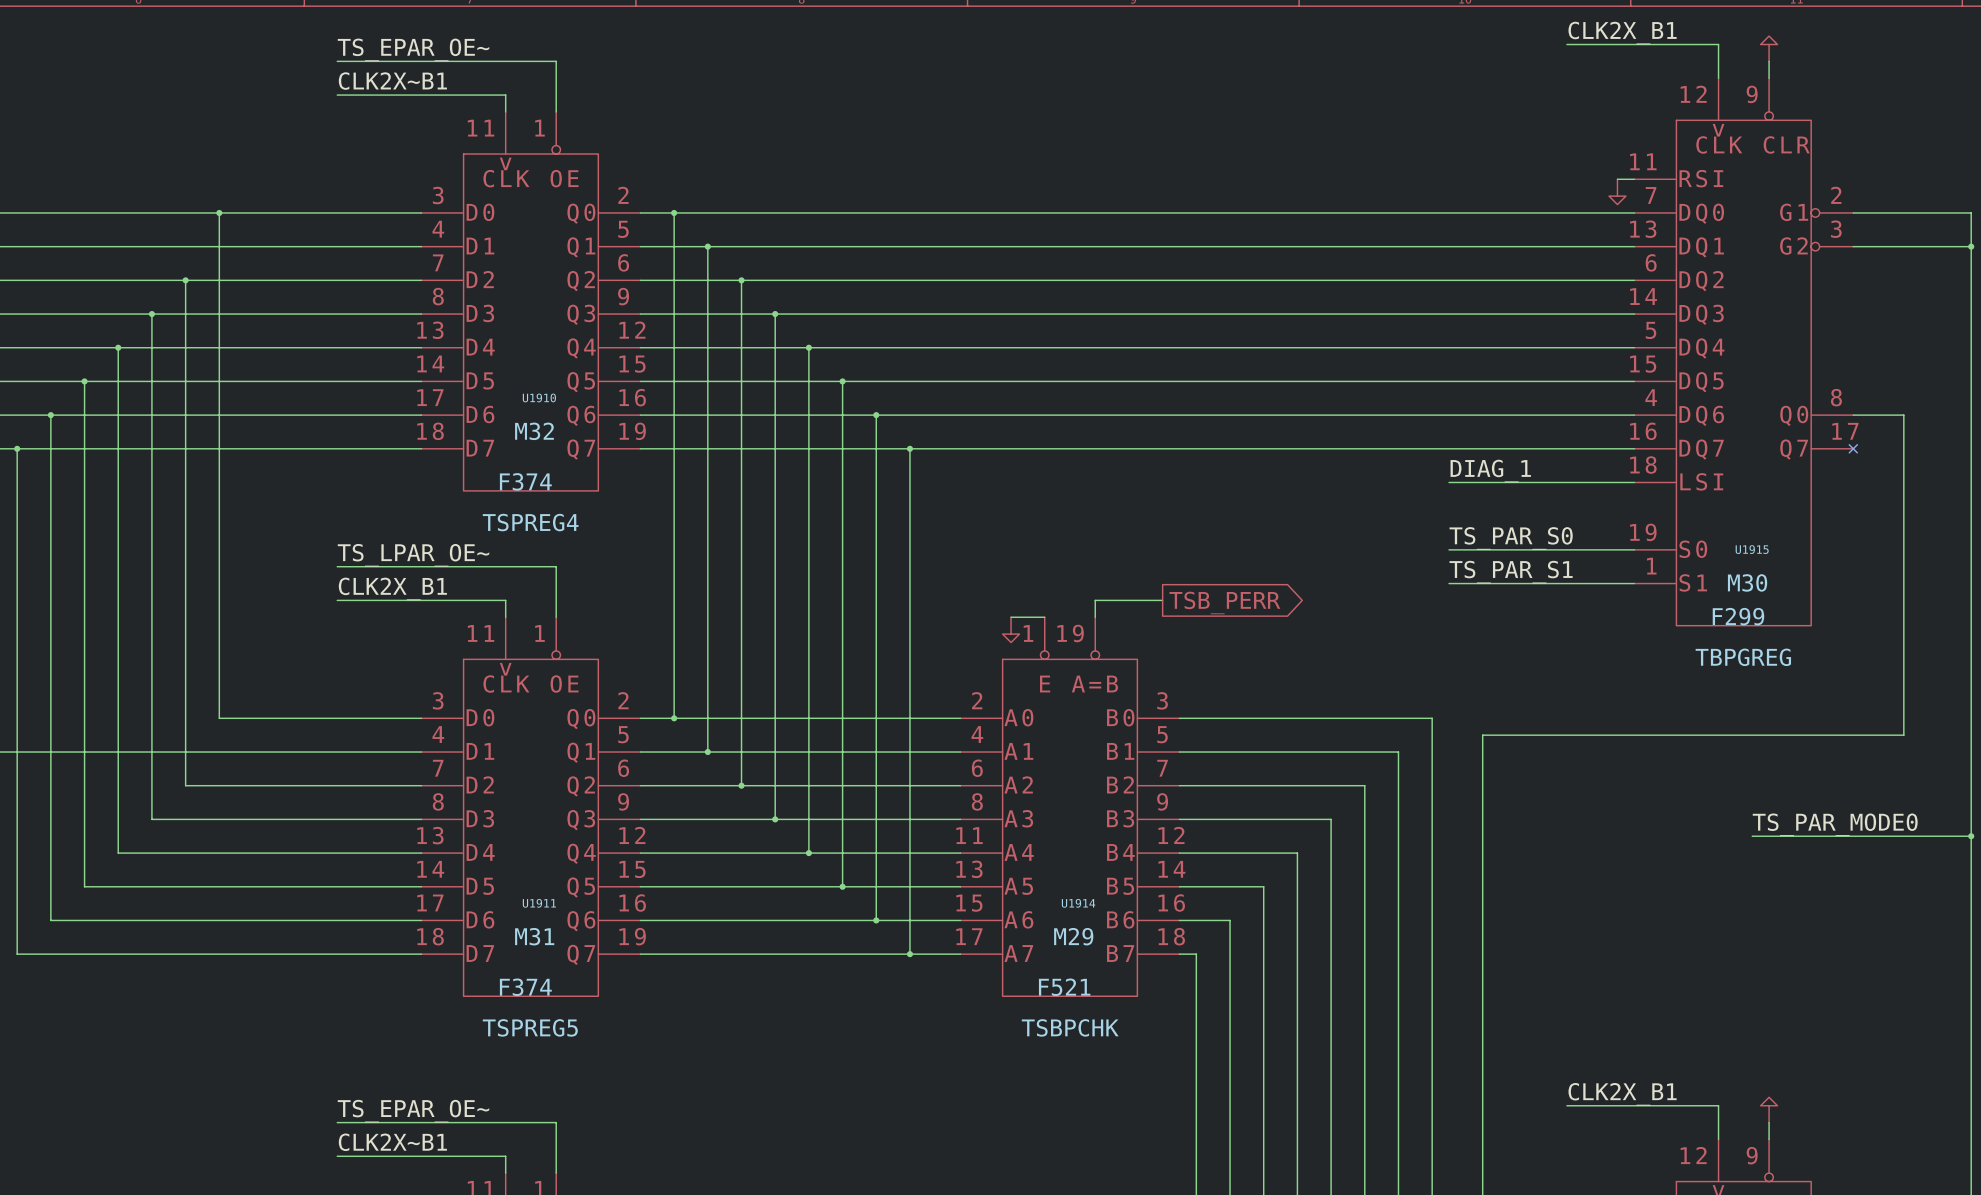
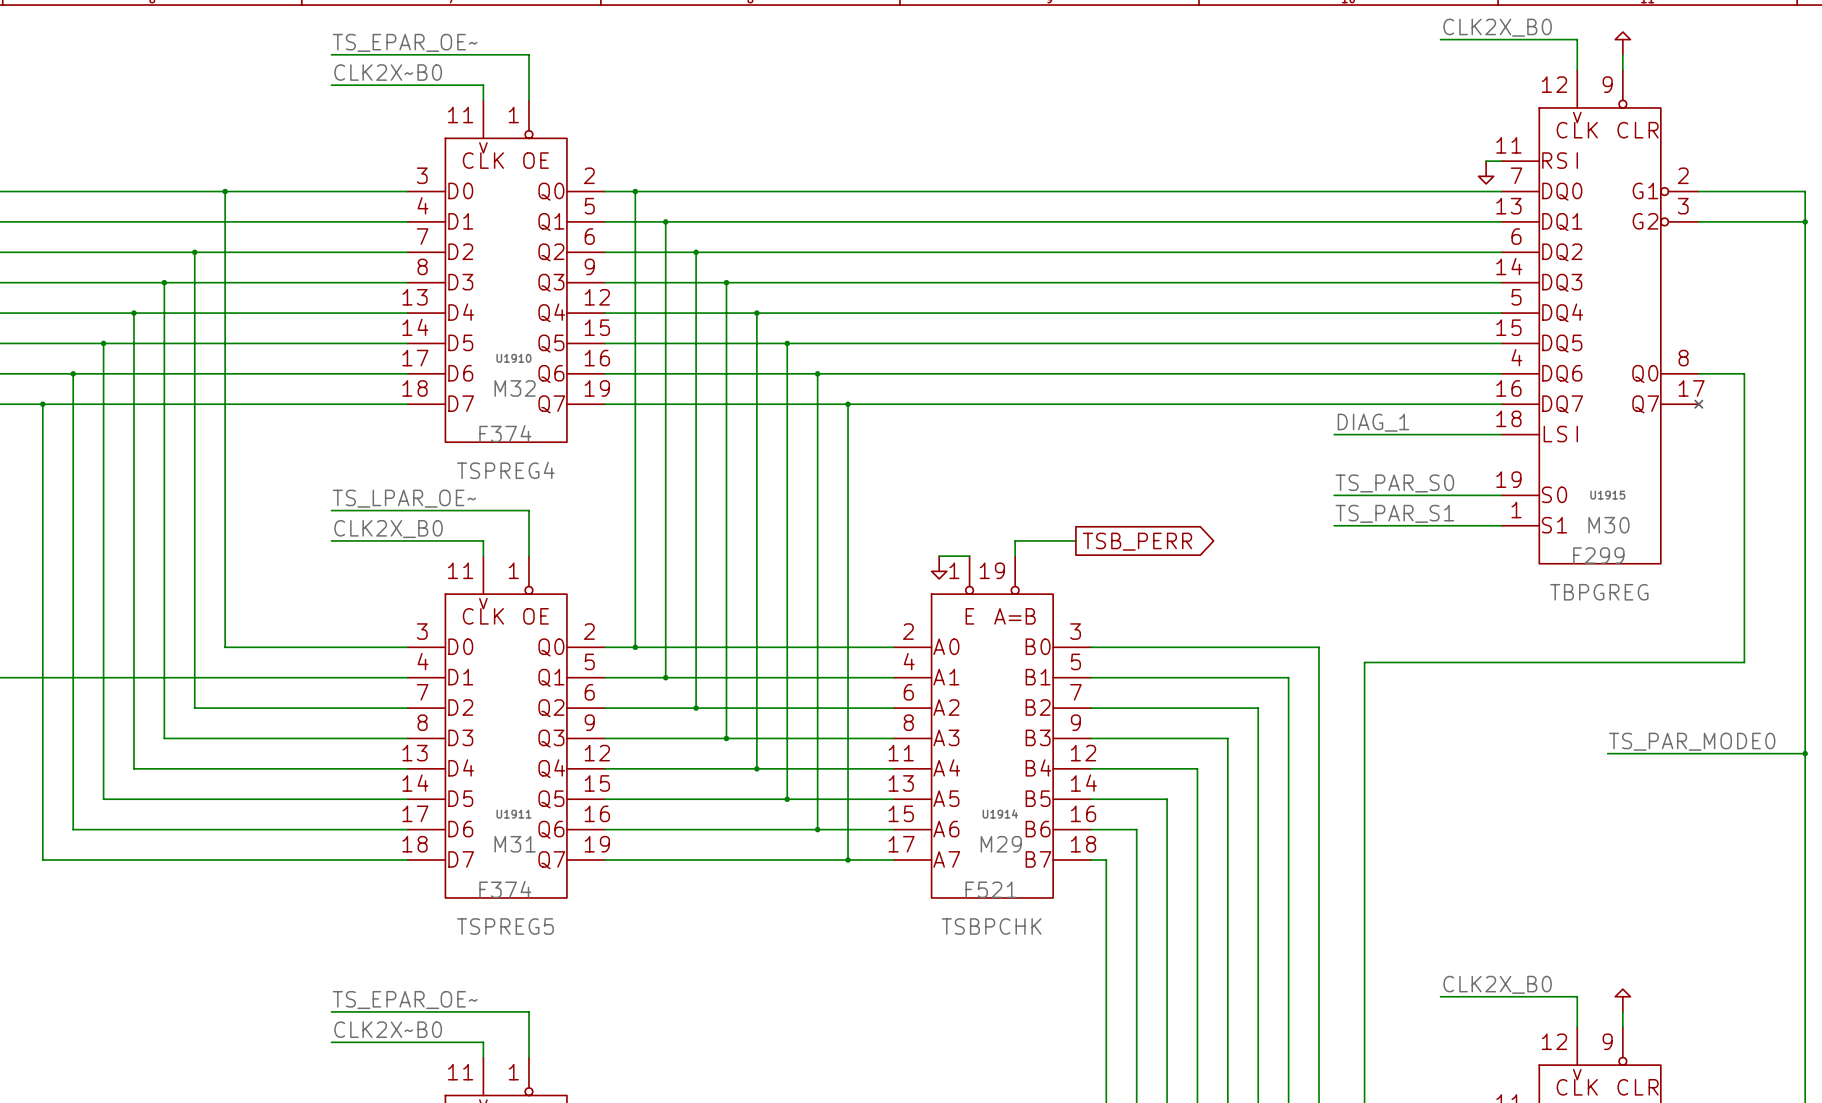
label: CLK2X_B1 (1622, 33) -> CLK2X_B0 (1497, 27)
label: CLK2X~B1 (392, 81) -> CLK2X~B0 (388, 72)
label: CLK2X_B1 (392, 588) -> CLK2X_B0 (388, 529)
label: CLK2X_B1 (1622, 1094) -> CLK2X_B0 (1497, 984)
label: CLK2X~B1 (392, 1142) -> CLK2X~B0 (388, 1029)

